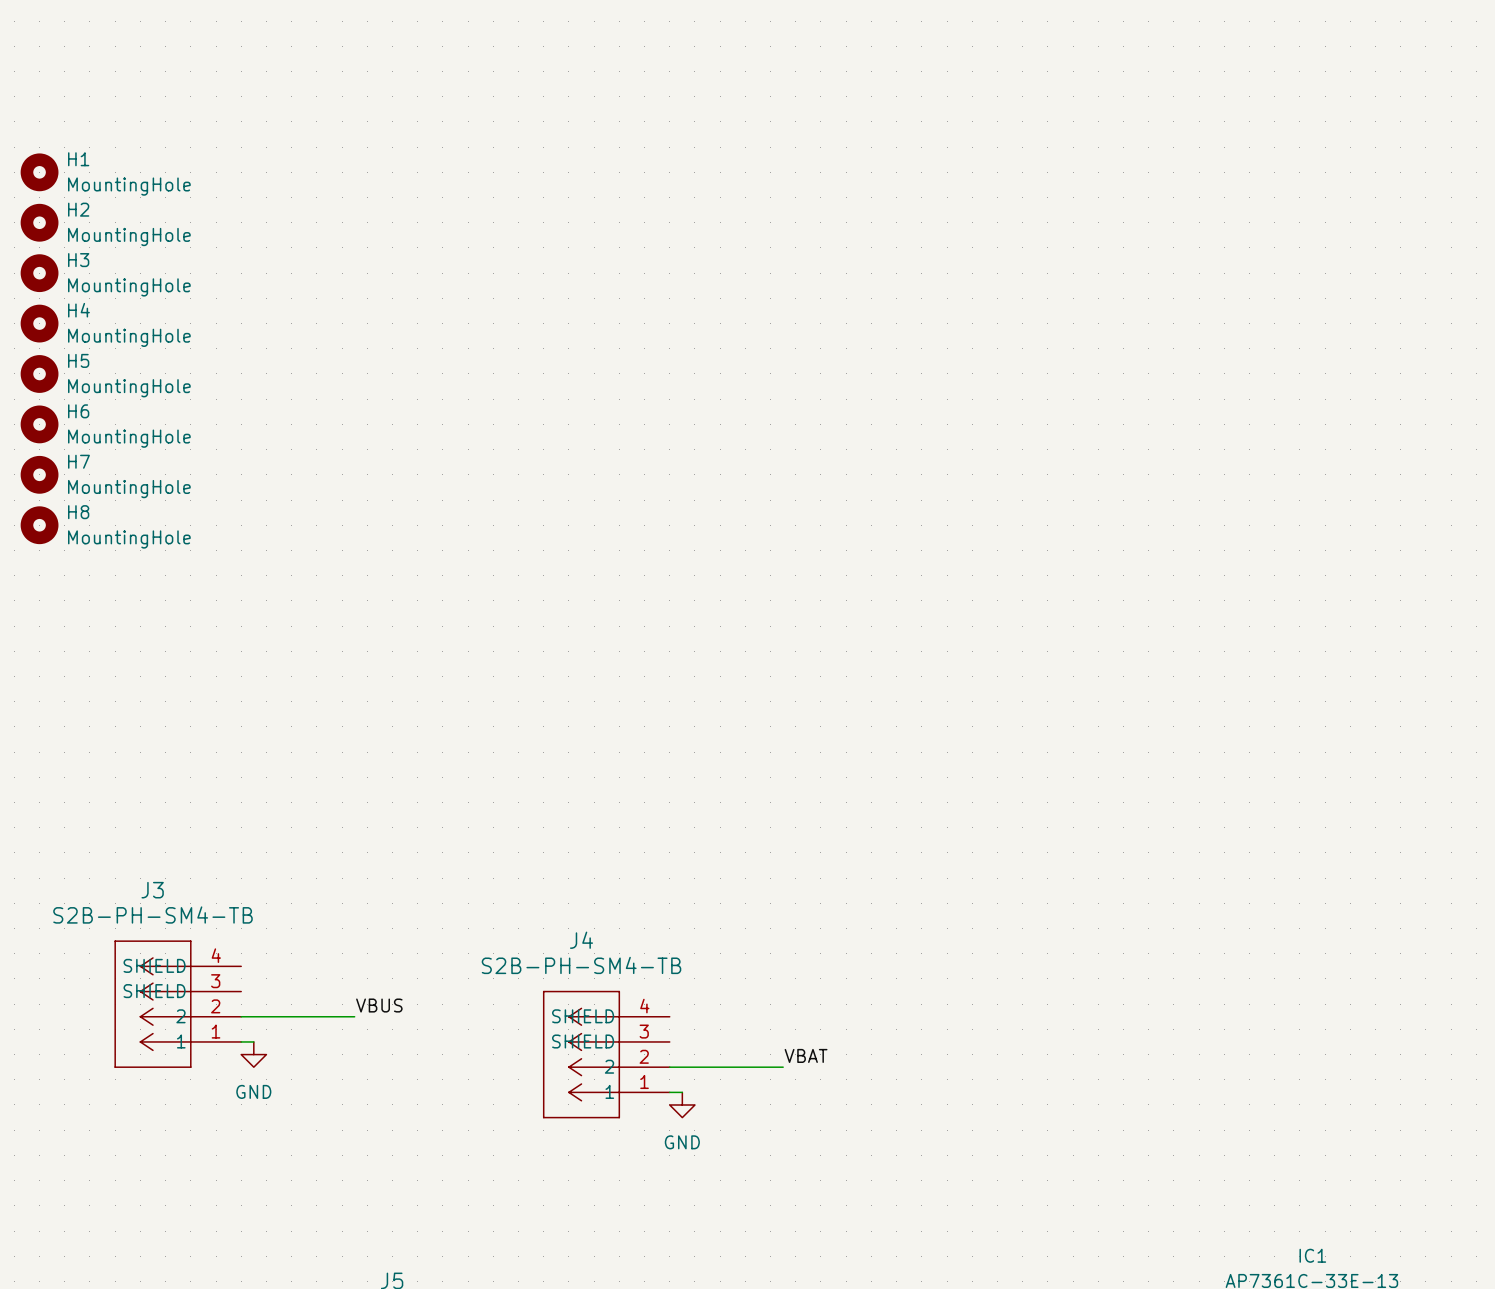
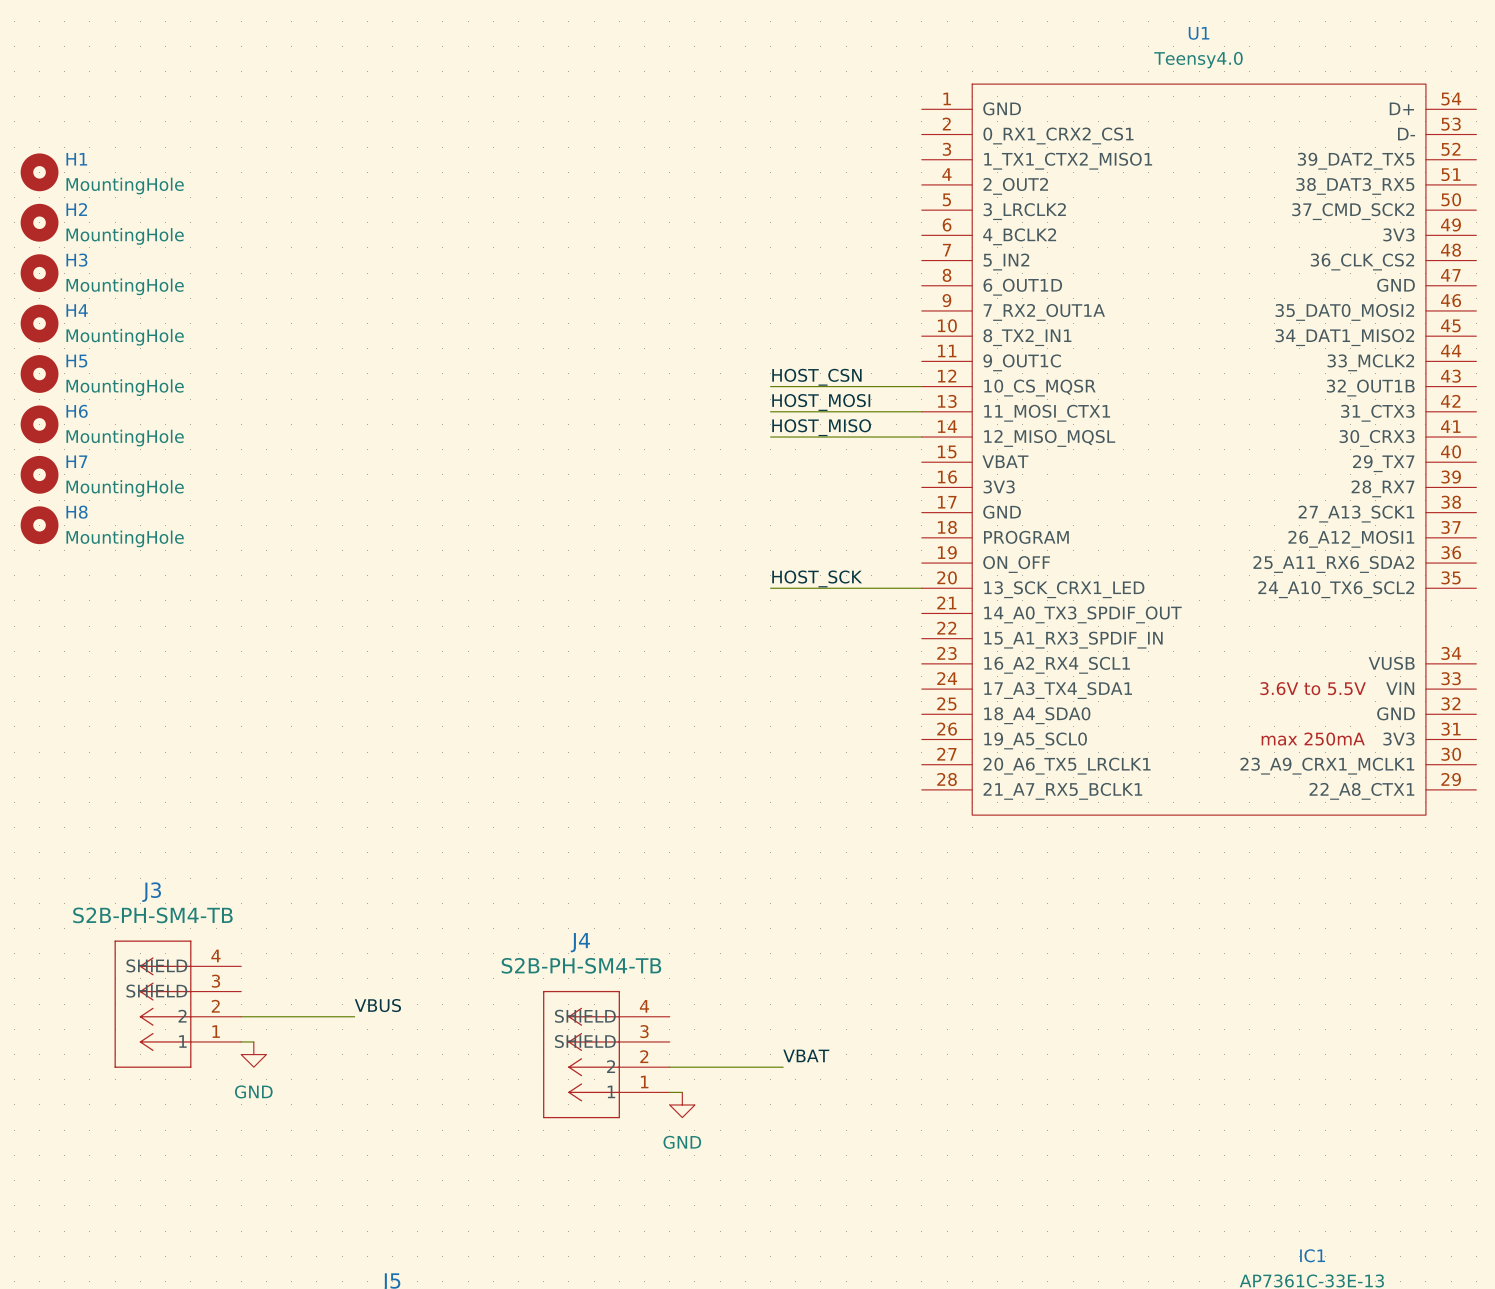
label: none -> HOST_CSN (816, 377)
wire: none -> (770, 386) (921, 386)
label: none -> HOST_MOSI (821, 402)
wire: none -> (770, 411) (921, 411)
label: none -> HOST_MISO (821, 427)
wire: none -> (770, 437) (921, 437)
U1: none -> Teensy4.0 (1199, 449)
label: none -> HOST_SCK (817, 578)
wire: none -> (770, 588) (921, 588)

